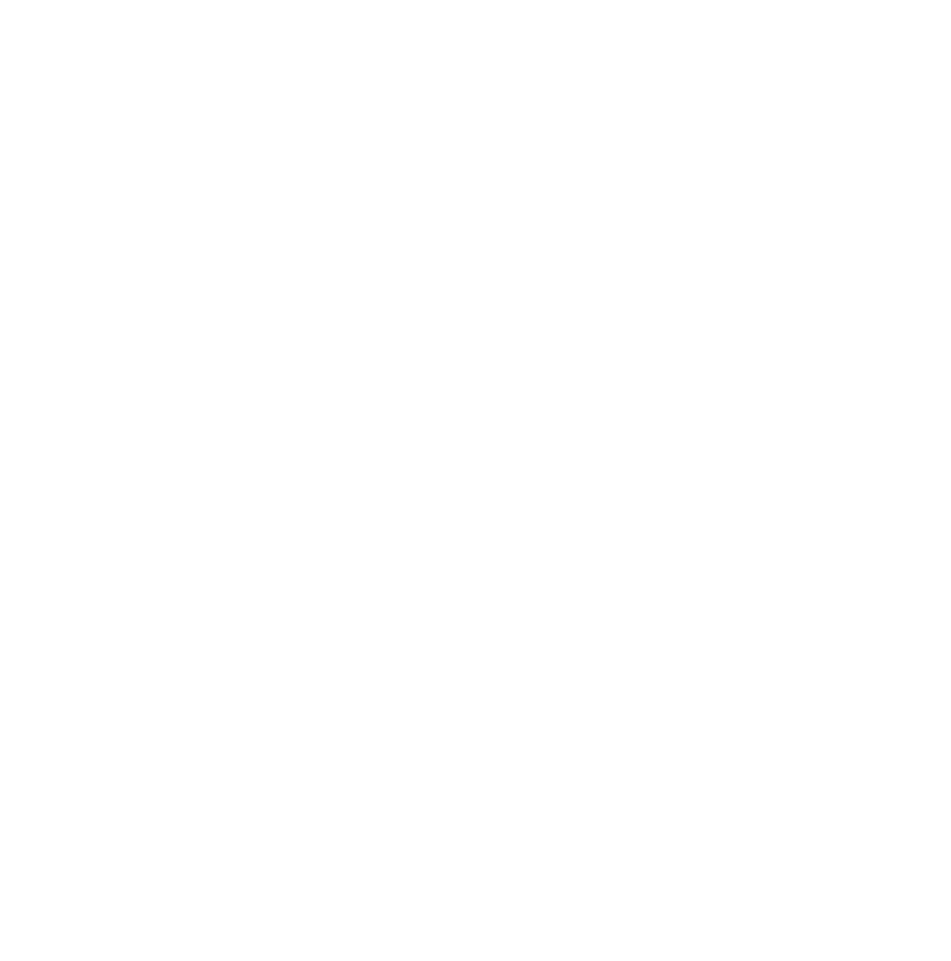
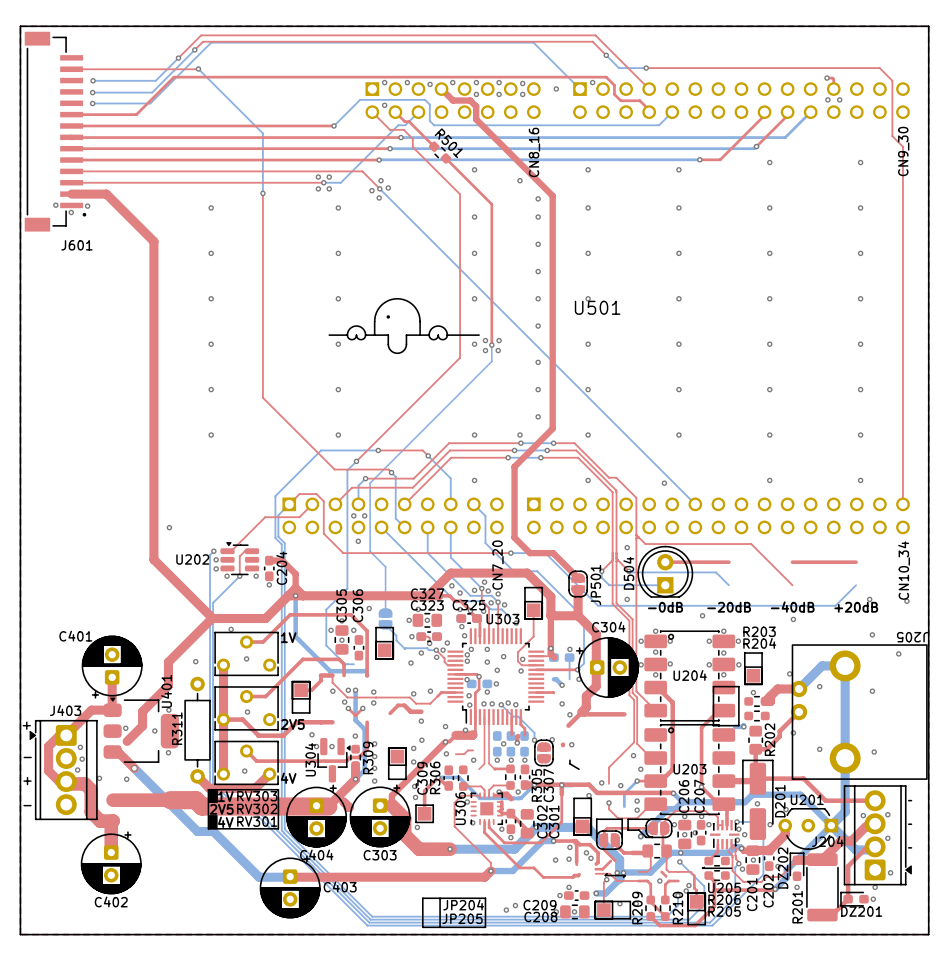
board edge: none -> (20, 26) (928, 26) (928, 934) (20, 934) (20, 26)
top track: none -> (194, 49) (202, 41) (592, 41) (606, 55)
bottom track: none -> (194, 49) (152, 92) (92, 92)
via: none -> (194, 49)
bottom track: none -> (606, 55) (618, 68) (646, 68)
via: none -> (606, 55)
top track: none -> (178, 58) (201, 35) (595, 35) (649, 89)
bottom track: none -> (178, 58) (155, 80) (93, 80)
via: none -> (178, 58)
top track: none -> (198, 68) (71, 69)
bottom track: none -> (198, 68) (262, 133) (262, 193)
via: none -> (198, 68)
top track: none -> (646, 68) (879, 68) (892, 80) (892, 136) (902, 146) (902, 504)
via: none -> (646, 68)
top track: none -> (826, 78) (833, 79) (833, 89)
via: none -> (826, 78)
via: none -> (93, 80)
via: none -> (384, 82)
via: none -> (407, 82)
via: none -> (452, 82)
via: none -> (476, 82)
via: none -> (499, 82)
via: none -> (592, 82)
via: none -> (522, 83)
via: none -> (430, 84)
via: none -> (556, 88)
top track: none -> (441, 89) (453, 100) (470, 100) (476, 106) (476, 119) (552, 195) (552, 428) (514, 466) (514, 537) (529, 553) (553, 553) (578, 578)
bottom track: none -> (579, 89) (533, 42) (211, 42) (150, 103) (92, 103)
via: none -> (92, 92)
via: none -> (476, 94)
via: none -> (499, 94)
via: none -> (522, 94)
via: none -> (827, 99)
via: none -> (839, 99)
via: none -> (92, 103)
via: none -> (384, 105)
top track: none -> (372, 112) (390, 129) (403, 129) (412, 138) (412, 147) (460, 194) (460, 357) (356, 461)
bottom track: none -> (418, 112) (405, 125) (398, 125) (340, 182) (323, 182)
bottom track: none -> (672, 112) (659, 125) (434, 125) (429, 120) (429, 104) (425, 99) (360, 99) (334, 125)
bottom track: none -> (810, 112) (785, 137) (401, 137)
top track: none -> (71, 114) (136, 114) (173, 77) (606, 77) (614, 85) (614, 94) (620, 100) (639, 100) (649, 110) (649, 115)
top track: none -> (395, 115) (395, 112) (404, 121) (409, 121) (434, 146)
top track: none -> (764, 115) (720, 159) (699, 159)
top track: none -> (787, 115) (756, 146)
top track: none -> (71, 125) (334, 125)
via: none -> (334, 125)
J601: none -> (55, 131)
top track: none -> (71, 137) (401, 137)
via: none -> (401, 137)
bottom track: none -> (756, 146) (754, 148) (390, 148)
via: none -> (756, 146)
top track: none -> (71, 148) (390, 148)
via: none -> (390, 148)
R501: none -> (440, 152)
top track: none -> (445, 158) (491, 204) (491, 345)
bottom track: none -> (699, 159) (379, 160)
via: none -> (699, 159)
top track: none -> (71, 160) (379, 160)
via: none -> (379, 160)
via: none -> (769, 162)
via: none -> (860, 162)
via: none -> (474, 169)
via: none -> (588, 169)
via: none -> (678, 169)
top track: none -> (71, 171) (362, 171) (379, 188)
via: none -> (318, 177)
via: none -> (329, 177)
via: none -> (381, 180)
via: none -> (519, 180)
top track: none -> (71, 182) (323, 182)
via: none -> (323, 182)
via: none -> (388, 187)
via: none -> (318, 188)
via: none -> (329, 188)
bottom track: none -> (379, 188) (695, 504)
via: none -> (379, 188)
via: none -> (371, 190)
top track: none -> (262, 193) (262, 397) (334, 469) (388, 469) (391, 472)
via: none -> (262, 193)
top track: none -> (71, 194) (106, 194) (153, 241) (153, 559) (212, 617)
via: none -> (379, 197)
via: none -> (538, 198)
via: none -> (55, 205)
via: none -> (87, 206)
via: none -> (211, 207)
via: none -> (338, 207)
via: none -> (588, 207)
via: none -> (678, 207)
via: none -> (769, 207)
via: none -> (860, 207)
via: none -> (71, 212)
via: none -> (474, 217)
via: none -> (538, 217)
via: none -> (538, 244)
via: none -> (211, 253)
via: none -> (338, 253)
via: none -> (474, 253)
via: none -> (588, 253)
via: none -> (678, 253)
via: none -> (769, 253)
via: none -> (860, 253)
via: none -> (538, 271)
via: none -> (211, 298)
via: none -> (338, 298)
via: none -> (474, 298)
via: none -> (538, 298)
via: none -> (588, 298)
via: none -> (678, 298)
via: none -> (769, 298)
via: none -> (860, 298)
U501: none -> (596, 308)
drawing: none -> [386, 315, 390, 319]
via: none -> (538, 326)
line: none -> (329, 335) (347, 335)
line: none -> (347, 335) (350, 328) (356, 326) (362, 328) (365, 335)
line: none -> (347, 335) (351, 339) (356, 335) (358, 338) (362, 339) (365, 335)
line: none -> (365, 335) (388, 335) (389, 348) (397, 353) (405, 348) (406, 335) (429, 335)
line: none -> (374, 335) (374, 318) (377, 310) (386, 301) (397, 298) (408, 301) (417, 310) (419, 318) (420, 335)
line: none -> (429, 335) (431, 328) (438, 326) (444, 328) (447, 335)
line: none -> (429, 335) (433, 339) (438, 335) (440, 338) (443, 339) (447, 335)
line: none -> (447, 335) (479, 335)
via: none -> (485, 340)
via: none -> (499, 340)
via: none -> (211, 344)
via: none -> (338, 344)
via: none -> (474, 344)
via: none -> (588, 344)
via: none -> (678, 344)
via: none -> (769, 344)
via: none -> (860, 344)
bottom track: none -> (491, 345) (491, 361) (370, 483) (370, 551) (385, 566) (385, 613)
via: none -> (491, 345)
via: none -> (485, 350)
via: none -> (498, 350)
via: none -> (538, 362)
via: none -> (211, 389)
via: none -> (338, 389)
via: none -> (538, 389)
via: none -> (588, 389)
via: none -> (678, 389)
via: none -> (769, 389)
via: none -> (860, 389)
via: none -> (538, 416)
via: none -> (211, 435)
via: none -> (338, 435)
via: none -> (474, 435)
via: none -> (519, 435)
via: none -> (588, 435)
via: none -> (678, 435)
via: none -> (769, 435)
via: none -> (860, 435)
top track: none -> (520, 443) (449, 443) (413, 478) (365, 478)
bottom track: none -> (520, 443) (553, 443)
via: none -> (520, 443)
top track: none -> (553, 443) (574, 443) (609, 477) (616, 477) (636, 497) (636, 691) (655, 710)
via: none -> (553, 443)
top track: none -> (378, 450) (422, 450) (428, 455)
bottom track: none -> (378, 450) (321, 450) (275, 496) (275, 537) (281, 544) (281, 830) (370, 919) (689, 919) (704, 904) (704, 886) (679, 861)
via: none -> (378, 450)
top track: none -> (514, 450) (450, 450) (412, 487) (352, 487) (335, 504)
bottom track: none -> (514, 450) (547, 450)
via: none -> (514, 450)
top track: none -> (547, 450) (576, 450) (616, 490) (616, 603) (632, 619) (632, 692) (637, 697) (637, 743) (651, 758) (655, 758)
via: none -> (547, 450)
bottom track: none -> (428, 455) (450, 478) (450, 504)
via: none -> (428, 455)
top track: none -> (508, 457) (451, 457) (404, 504)
bottom track: none -> (508, 457) (540, 457)
via: none -> (508, 457)
top track: none -> (540, 457) (578, 457) (612, 492) (612, 603) (629, 620) (629, 695) (634, 700) (634, 742) (609, 767) (609, 783)
via: none -> (540, 457)
bottom track: none -> (356, 461) (347, 470) (347, 588) (326, 609) (326, 645) (345, 664) (353, 664)
via: none -> (356, 461)
bottom track: none -> (391, 472) (395, 476) (395, 518) (404, 527)
via: none -> (391, 472)
bottom track: none -> (365, 478) (358, 485) (358, 504)
via: none -> (365, 478)
via: none -> (474, 480)
via: none -> (588, 480)
via: none -> (769, 480)
via: none -> (860, 480)
via: none -> (664, 483)
top track: none -> (289, 504) (299, 494) (316, 494) (323, 501) (323, 533) (343, 553) (510, 553)
bottom track: none -> (289, 504) (278, 515) (278, 536) (284, 543) (284, 829) (372, 916) (666, 916) (678, 905) (678, 895)
top track: none -> (312, 504) (299, 517) (265, 517) (231, 551)
bottom track: none -> (473, 504) (485, 515) (485, 543) (513, 571) (537, 571) (584, 618) (584, 663) (577, 669)
via: none -> (353, 515)
via: none -> (364, 515)
via: none -> (169, 527)
bottom track: none -> (381, 527) (455, 601) (482, 601) (490, 609) (501, 609) (510, 618)
bottom track: none -> (427, 527) (427, 552) (470, 595) (491, 595) (498, 602)
bottom track: none -> (450, 527) (450, 557) (481, 588)
top track: none -> (636, 534) (645, 544) (751, 544) (792, 585)
top track: none -> (639, 537) (636, 538)
via: none -> (358, 541)
via: none -> (627, 547)
bottom track: none -> (213, 551) (210, 555) (210, 784) (229, 803) (245, 803) (367, 925) (712, 925) (763, 874) (763, 834) (750, 821) (737, 821)
via: none -> (213, 551)
top track: none -> (252, 551) (244, 551) (239, 556) (239, 576)
bottom track: none -> (510, 553) (545, 553) (598, 605) (835, 605) (856, 585)
via: none -> (510, 553)
U202: none -> (239, 558)
top track: none -> (616, 558) (628, 571)
via: none -> (216, 559)
top track: none -> (269, 560) (282, 560) (295, 574) (295, 595)
top track: none -> (612, 560) (601, 571)
top track: none -> (665, 562) (728, 562)
top track: none -> (792, 562) (856, 562)
via: none -> (216, 568)
C204: none -> (269, 568)
bottom track: none -> (601, 571) (601, 577) (609, 585) (665, 585)
via: none -> (601, 571)
bottom track: none -> (628, 571) (716, 572) (728, 585)
via: none -> (628, 571)
D504: none -> (665, 571)
via: none -> (227, 576)
bottom track: none -> (239, 576) (212, 602) (212, 782) (230, 800) (246, 800) (369, 922) (710, 922) (735, 897) (735, 867) (738, 863)
via: none -> (239, 576)
via: none -> (256, 576)
via: none -> (484, 582)
JP501: none -> (578, 583)
via: none -> (269, 584)
via: none -> (451, 585)
line: none -> (524, 587) (542, 587) (542, 618) (524, 618) (524, 587)
top track: none -> (481, 588) (481, 601) (489, 608) (489, 636)
via: none -> (481, 588)
top track: none -> (578, 589) (578, 615)
via: none -> (474, 590)
via: none -> (488, 591)
via: none -> (460, 593)
via: none -> (498, 593)
top track: none -> (288, 595) (449, 595) (455, 601) (460, 601) (479, 621) (479, 636)
bottom track: none -> (295, 595) (295, 636) (330, 671) (365, 671)
via: none -> (295, 595)
top track: none -> (302, 595) (295, 588) (265, 618) (212, 618) (168, 662) (168, 685) (142, 711) (142, 725) (127, 741)
top track: none -> (428, 595) (450, 573) (527, 573) (550, 596) (550, 615)
via: none -> (627, 599)
via: none -> (869, 599)
via: none -> (906, 601)
via: none -> (491, 602)
top track: none -> (498, 602) (498, 636)
via: none -> (498, 602)
via: none -> (504, 604)
text: none -> -0dB (665, 607)
text: none -> -20dB (729, 607)
text: none -> -40dB (792, 607)
text: none -> +20dB (856, 607)
via: none -> (369, 608)
via: none -> (418, 609)
via: none -> (460, 609)
top track: none -> (533, 609) (533, 636) (517, 652) (517, 661) (521, 665) (536, 665)
via: none -> (470, 610)
part: none -> (533, 610)
via: none -> (483, 611)
top track: none -> (550, 615) (578, 615)
top track: none -> (550, 615) (550, 654) (554, 657) (536, 656)
top track: none -> (578, 615) (596, 633) (596, 686) (586, 696) (586, 707) (581, 712)
via: none -> (702, 615)
part: none -> (385, 618)
C325: none -> (469, 618)
via: none -> (793, 619)
via: none -> (341, 620)
via: none -> (409, 620)
C327: none -> (427, 620)
via: none -> (427, 620)
via: none -> (516, 623)
bottom track: none -> (385, 624) (396, 635) (396, 640) (404, 648) (427, 648) (436, 650)
via: none -> (461, 626)
line: none -> (376, 627) (393, 627) (393, 658) (376, 658) (376, 627)
via: none -> (231, 629)
via: none -> (331, 630)
via: none -> (353, 630)
via: none -> (655, 631)
via: none -> (723, 631)
via: none -> (872, 634)
via: none -> (464, 635)
via: none -> (411, 636)
top track: none -> (421, 636) (428, 636) (429, 643)
C323: none -> (429, 636)
text: none -> 1V (288, 637)
C305: none -> (341, 639)
via: none -> (341, 640)
via: none -> (641, 641)
via: none -> (670, 641)
via: none -> (709, 641)
via: none -> (738, 641)
top track: none -> (246, 642) (263, 642) (290, 614) (351, 614) (367, 630) (367, 675)
via: none -> (429, 643)
via: none -> (447, 643)
C306: none -> (358, 647)
via: none -> (550, 648)
via: none -> (471, 649)
via: none -> (487, 649)
via: none -> (569, 649)
part: none -> (384, 650)
top track: none -> (436, 650) (444, 658) (444, 662) (447, 665) (455, 665)
via: none -> (436, 650)
via: none -> (443, 650)
via: none -> (655, 652)
RV303: none -> (246, 653)
via: none -> (421, 653)
via: none -> (723, 653)
line: none -> (744, 653) (762, 653) (762, 684) (744, 684) (744, 653)
via: none -> (898, 653)
via: none -> (467, 654)
via: none -> (503, 656)
via: none -> (436, 657)
part: none -> (561, 657)
bottom track: none -> (569, 657) (569, 679)
via: none -> (246, 658)
via: none -> (522, 659)
via: none -> (195, 661)
via: none -> (467, 661)
via: none -> (487, 662)
via: none -> (410, 663)
via: none -> (670, 663)
via: none -> (641, 664)
via: none -> (709, 664)
via: none -> (738, 664)
top track: none -> (223, 665) (223, 774)
C401: none -> (112, 667)
C304: none -> (607, 667)
top track: none -> (536, 669) (577, 669)
via: none -> (577, 669)
via: none -> (497, 670)
via: none -> (521, 671)
via: none -> (789, 673)
top track: none -> (455, 674) (476, 674) (479, 676) (479, 689) (475, 693) (475, 732) (472, 735) (455, 735) (449, 741) (445, 741) (391, 795) (391, 805) (404, 818) (404, 834) (419, 849) (450, 849)
via: none -> (655, 674)
via: none -> (723, 674)
top track: none -> (344, 675) (344, 664) (339, 659) (302, 659) (265, 696) (246, 696)
part: none -> (753, 675)
via: none -> (479, 676)
U303: none -> (495, 676)
U204: none -> (689, 676)
top track: none -> (112, 677) (112, 709) (91, 710) (66, 735) (59, 735) (48, 746) (48, 770) (59, 781) (85, 783) (91, 790) (91, 811) (100, 821) (113, 821) (111, 822) (111, 852)
via: none -> (467, 679)
bottom track: none -> (553, 679) (562, 685)
via: none -> (579, 679)
line: none -> (292, 681) (309, 681) (309, 712) (292, 712) (292, 681)
part: none -> (479, 683)
via: none -> (496, 683)
via: none -> (562, 685)
line: none -> (713, 686) (738, 686) (738, 725) (713, 725) (713, 686)
via: none -> (819, 686)
top track: none -> (655, 687) (672, 702) (672, 769) (661, 781) (637, 781)
top track: none -> (799, 688) (777, 688) (765, 701) (770, 701) (770, 696)
bottom track: none -> (799, 688) (822, 665) (845, 665) (845, 811) (831, 825)
top track: none -> (301, 690) (311, 690) (320, 680) (320, 675) (332, 675) (332, 682) (347, 697) (409, 697) (416, 703) (430, 703) (441, 692) (455, 692)
part: none -> (301, 690)
via: none -> (348, 690)
bottom track: none -> (355, 690) (355, 720) (364, 729) (364, 770) (355, 779)
via: none -> (355, 690)
via: none -> (332, 691)
via: none -> (430, 691)
via: none -> (872, 691)
via: none -> (373, 692)
via: none -> (487, 692)
top track: none -> (536, 692) (553, 692)
via: none -> (753, 692)
via: none -> (413, 693)
via: none -> (469, 695)
R204: none -> (756, 701)
via: none -> (344, 702)
via: none -> (373, 702)
via: none -> (508, 702)
via: none -> (484, 703)
via: none -> (492, 703)
via: none -> (562, 703)
bottom track: none -> (501, 704) (513, 716) (518, 716) (534, 732) (534, 740)
via: none -> (501, 704)
via: none -> (515, 704)
via: none -> (469, 705)
RV302: none -> (246, 708)
top track: none -> (348, 708) (355, 715) (362, 708)
via: none -> (348, 708)
via: none -> (362, 708)
via: none -> (168, 710)
top track: none -> (723, 710) (718, 710) (701, 727) (701, 786) (715, 801)
top track: none -> (420, 711) (410, 711) (404, 705) (398, 705) (390, 713)
via: none -> (247, 712)
top track: none -> (799, 712) (779, 731) (779, 736) (767, 749) (755, 749) (755, 782) (757, 785)
J205: none -> (859, 712)
via: none -> (569, 714)
top track: none -> (624, 714) (579, 714) (568, 725)
R203: none -> (756, 715)
top track: none -> (484, 717) (484, 763) (479, 769)
top track: none -> (489, 717) (489, 763) (494, 769) (510, 768)
top track: none -> (511, 717) (511, 734)
top track: none -> (520, 717) (520, 724) (524, 728) (524, 735)
top track: none -> (223, 719) (242, 719) (258, 735) (283, 735) (296, 722) (332, 722)
via: none -> (421, 721)
top track: none -> (367, 722) (367, 749) (359, 757) (350, 757) (346, 761) (256, 761) (246, 751)
text: none -> 2V5 (292, 724)
text: none -> + (26, 725)
bottom track: none -> (743, 725) (743, 726) (735, 726)
via: none -> (445, 726)
via: none -> (743, 726)
via: none -> (125, 728)
U401: none -> (141, 730)
via: none -> (154, 730)
R311: none -> (197, 730)
via: none -> (465, 730)
via: none -> (793, 732)
via: none -> (311, 734)
via: none -> (355, 736)
top track: none -> (518, 736) (517, 742)
via: none -> (552, 739)
via: none -> (421, 740)
via: none -> (534, 740)
R202: none -> (755, 740)
via: none -> (445, 742)
via: none -> (517, 742)
via: none -> (374, 743)
part: none -> (497, 743)
via: none -> (503, 743)
part: none -> (510, 743)
part: none -> (524, 743)
top track: none -> (563, 744) (563, 745)
via: none -> (571, 744)
via: none -> (316, 746)
via: none -> (331, 746)
via: none -> (80, 747)
line: none -> (388, 747) (406, 747) (406, 779) (388, 779) (388, 747)
via: none -> (413, 748)
via: none -> (819, 749)
top track: none -> (473, 750) (467, 750) (464, 754) (455, 754)
top track: none -> (112, 752) (118, 752) (134, 768)
via: none -> (168, 752)
part: none -> (543, 752)
via: none -> (874, 752)
via: none -> (446, 753)
via: none -> (633, 755)
via: none -> (374, 756)
part: none -> (397, 756)
text: none -> - (27, 757)
R309: none -> (355, 757)
via: none -> (82, 759)
U304: none -> (334, 760)
via: none -> (473, 760)
via: none -> (497, 760)
via: none -> (511, 760)
via: none -> (524, 760)
line: none -> (569, 760) (569, 763) (579, 769)
RV301: none -> (246, 762)
via: none -> (413, 762)
top track: none -> (355, 765) (355, 779) (328, 806) (202, 806) (195, 800) (113, 800)
bottom track: none -> (134, 768) (197, 831) (213, 831) (259, 877) (290, 876)
via: none -> (134, 768)
via: none -> (374, 768)
via: none -> (640, 769)
U203: none -> (689, 769)
J403: none -> (63, 770)
via: none -> (77, 770)
via: none -> (244, 771)
top track: none -> (269, 774) (255, 788) (209, 788) (197, 776)
bottom track: none -> (438, 777) (459, 777) (480, 798) (520, 798) (534, 784)
via: none -> (438, 777)
R305: none -> (510, 777)
C307: none -> (525, 777)
via: none -> (99, 778)
text: none -> 4V (288, 778)
C309: none -> (448, 778)
R306: none -> (463, 778)
via: none -> (126, 779)
via: none -> (355, 779)
text: none -> + (27, 781)
via: none -> (374, 781)
bottom track: none -> (637, 781) (624, 793) (624, 806)
via: none -> (637, 781)
top track: none -> (723, 781) (803, 778) (825, 800) (875, 800)
via: none -> (601, 782)
line: none -> (416, 783) (416, 787)
via: none -> (534, 784)
top track: none -> (448, 785) (438, 777) (424, 791) (424, 813)
top track: none -> (510, 785) (493, 785) (489, 790) (489, 795)
top track: none -> (525, 785) (561, 785)
top track: none -> (561, 785) (589, 784) (597, 792) (673, 793)
top track: none -> (561, 785) (561, 821) (540, 842) (504, 842) (489, 827) (489, 821)
via: none -> (561, 785)
via: none -> (620, 785)
via: none -> (414, 786)
top track: none -> (463, 786) (481, 786) (484, 789) (484, 795)
via: none -> (701, 786)
line: none -> (208, 789) (278, 789) (278, 828) (208, 828) (208, 789)
drawing: none -> [208, 789, 218, 803]
top track: none -> (499, 791) (507, 792) (511, 796)
via: none -> (499, 791)
via: none -> (518, 791)
bottom track: none -> (673, 793) (682, 802)
via: none -> (673, 793)
top track: none -> (480, 795) (461, 795) (454, 802) (454, 826) (490, 862) (490, 871) (484, 877) (290, 876)
top track: none -> (494, 795) (507, 795) (511, 799)
via: none -> (589, 795)
text: none -> 1V (225, 796)
via: none -> (415, 797)
line: none -> (574, 798) (591, 798) (591, 835) (574, 835) (574, 798)
D201: none -> (757, 799)
line: none -> (908, 800) (911, 800)
top track: none -> (343, 801) (349, 807) (347, 806)
via: none -> (467, 801)
top track: none -> (501, 801) (500, 811) (502, 813) (510, 813) (527, 829) (527, 833) (530, 833)
via: none -> (637, 801)
top track: none -> (609, 802) (609, 809) (618, 818) (637, 818) (648, 806)
via: none -> (609, 802)
bottom track: none -> (682, 802) (675, 809) (668, 809) (640, 836)
bottom track: none -> (682, 802) (745, 802) (752, 794) (800, 794) (855, 849) (875, 849)
via: none -> (757, 803)
text: none -> - (27, 805)
top track: none -> (723, 805) (726, 807) (726, 825)
U306: none -> (486, 808)
text: none -> 2V5 (221, 809)
via: none -> (786, 809)
via: none -> (637, 810)
part: none -> (424, 813)
via: none -> (887, 814)
drawing: none -> [208, 815, 218, 830]
C303: none -> (380, 815)
via: none -> (863, 815)
C404: none -> (316, 816)
via: none -> (684, 816)
via: none -> (701, 816)
line: none -> (658, 819) (628, 819) (628, 830) (638, 830) (646, 837) (652, 837)
top track: none -> (484, 821) (484, 832) (519, 867) (533, 867) (543, 877) (572, 877) (579, 874)
C302: none -> (510, 821)
via: none -> (737, 821)
text: none -> 4V (225, 822)
via: none -> (472, 822)
C301: none -> (527, 823)
via: none -> (674, 824)
via: none -> (708, 824)
via: none -> (770, 824)
line: none -> (908, 824) (911, 824)
top track: none -> (653, 825) (651, 828) (607, 828) (604, 831) (604, 850) (615, 861)
top track: none -> (722, 825) (717, 825) (717, 817) (715, 814) (709, 814) (705, 811) (675, 811) (662, 823) (662, 826)
top track: none -> (785, 825) (785, 834) (769, 850) (743, 850) (741, 848)
bottom track: none -> (831, 825) (786, 870) (786, 877) (775, 889)
part: none -> (582, 826)
top track: none -> (875, 826) (865, 826) (851, 841) (841, 841) (821, 860) (797, 860) (780, 876) (766, 876) (761, 881) (743, 881) (732, 871) (732, 855) (728, 851)
via: none -> (417, 827)
via: none -> (536, 827)
JP204: none -> (658, 828)
via: none -> (501, 829)
via: none -> (738, 829)
U201: none -> (808, 829)
top track: none -> (664, 830) (662, 828) (662, 847) (666, 851) (666, 869) (668, 871) (690, 871) (694, 875) (696, 901)
via: none -> (695, 832)
C207: none -> (701, 832)
C206: none -> (684, 834)
via: none -> (684, 834)
U205: none -> (724, 834)
via: none -> (744, 834)
J204: none -> (877, 835)
via: none -> (640, 836)
via: none -> (510, 837)
line: none -> (596, 837) (596, 819) (622, 819) (622, 837)
via: none -> (887, 838)
JP205: none -> (609, 840)
via: none -> (737, 840)
top track: none -> (553, 841) (576, 841) (579, 844) (589, 844) (598, 852) (598, 862) (596, 864)
bottom track: none -> (553, 841) (542, 841) (512, 871) (490, 871)
via: none -> (553, 841)
top track: none -> (573, 841) (576, 844) (576, 864)
top track: none -> (717, 844) (717, 851) (708, 861)
top track: none -> (731, 844) (736, 848) (735, 855) (738, 863)
top track: none -> (875, 846) (867, 846) (848, 866) (848, 899) (834, 913) (824, 913) (822, 915)
via: none -> (569, 847)
top track: none -> (618, 847) (618, 843) (615, 840) (615, 844) (624, 852) (647, 852)
line: none -> (908, 847) (911, 847)
bottom track: none -> (741, 848) (734, 847) (728, 852) (670, 852) (650, 872) (624, 872)
via: none -> (741, 848)
bottom track: none -> (450, 849) (514, 849) (536, 827) (587, 827) (619, 859) (620, 878) (605, 893) (596, 893)
via: none -> (450, 849)
part: none -> (657, 851)
via: none -> (586, 852)
top track: none -> (650, 852) (650, 868) (647, 871) (638, 871)
via: none -> (680, 852)
via: none -> (590, 858)
C202: none -> (769, 858)
via: none -> (569, 859)
via: none -> (555, 860)
C201: none -> (752, 860)
via: none -> (753, 860)
top track: none -> (610, 861) (602, 869) (595, 869)
via: none -> (679, 861)
R206: none -> (717, 861)
C402: none -> (111, 862)
via: none -> (738, 863)
via: none -> (777, 866)
DZ202: none -> (797, 866)
line: none -> (704, 867) (702, 868) (731, 868)
via: none -> (742, 869)
via: none -> (490, 871)
top track: none -> (661, 871) (666, 876)
via: none -> (617, 872)
via: none -> (623, 872)
via: none -> (890, 872)
top track: none -> (595, 873) (609, 873) (617, 881) (638, 881)
line: none -> (607, 873) (605, 875) (625, 875) (623, 877)
top track: none -> (708, 875) (714, 881) (714, 906) (695, 925) (659, 925) (650, 916)
R205: none -> (717, 875)
top track: none -> (606, 879) (603, 882) (603, 910)
via: none -> (606, 879)
top track: none -> (638, 881) (647, 881) (650, 884) (650, 902) (665, 916)
via: none -> (659, 881)
top track: none -> (678, 881) (669, 881) (665, 884) (665, 899)
via: none -> (688, 885)
C403: none -> (290, 886)
via: none -> (569, 887)
via: none -> (797, 887)
R201: none -> (822, 887)
via: none -> (875, 887)
top track: none -> (775, 889) (714, 890)
via: none -> (775, 889)
via: none -> (686, 891)
via: none -> (596, 893)
line: none -> (688, 893) (705, 893) (705, 924) (688, 924) (688, 893)
via: none -> (559, 895)
C209: none -> (576, 895)
via: none -> (678, 895)
line: none -> (422, 898) (485, 898) (485, 927) (422, 927) (422, 898)
line: none -> (440, 898) (440, 927)
DZ201: none -> (854, 899)
via: none -> (873, 899)
line: none -> (595, 901) (630, 901) (630, 918) (595, 918) (595, 901)
part: none -> (696, 901)
via: none -> (619, 903)
via: none -> (636, 903)
via: none -> (515, 905)
R209: none -> (650, 908)
R210: none -> (665, 908)
via: none -> (506, 910)
part: none -> (603, 910)
via: none -> (556, 911)
C208: none -> (574, 911)
via: none -> (574, 911)

